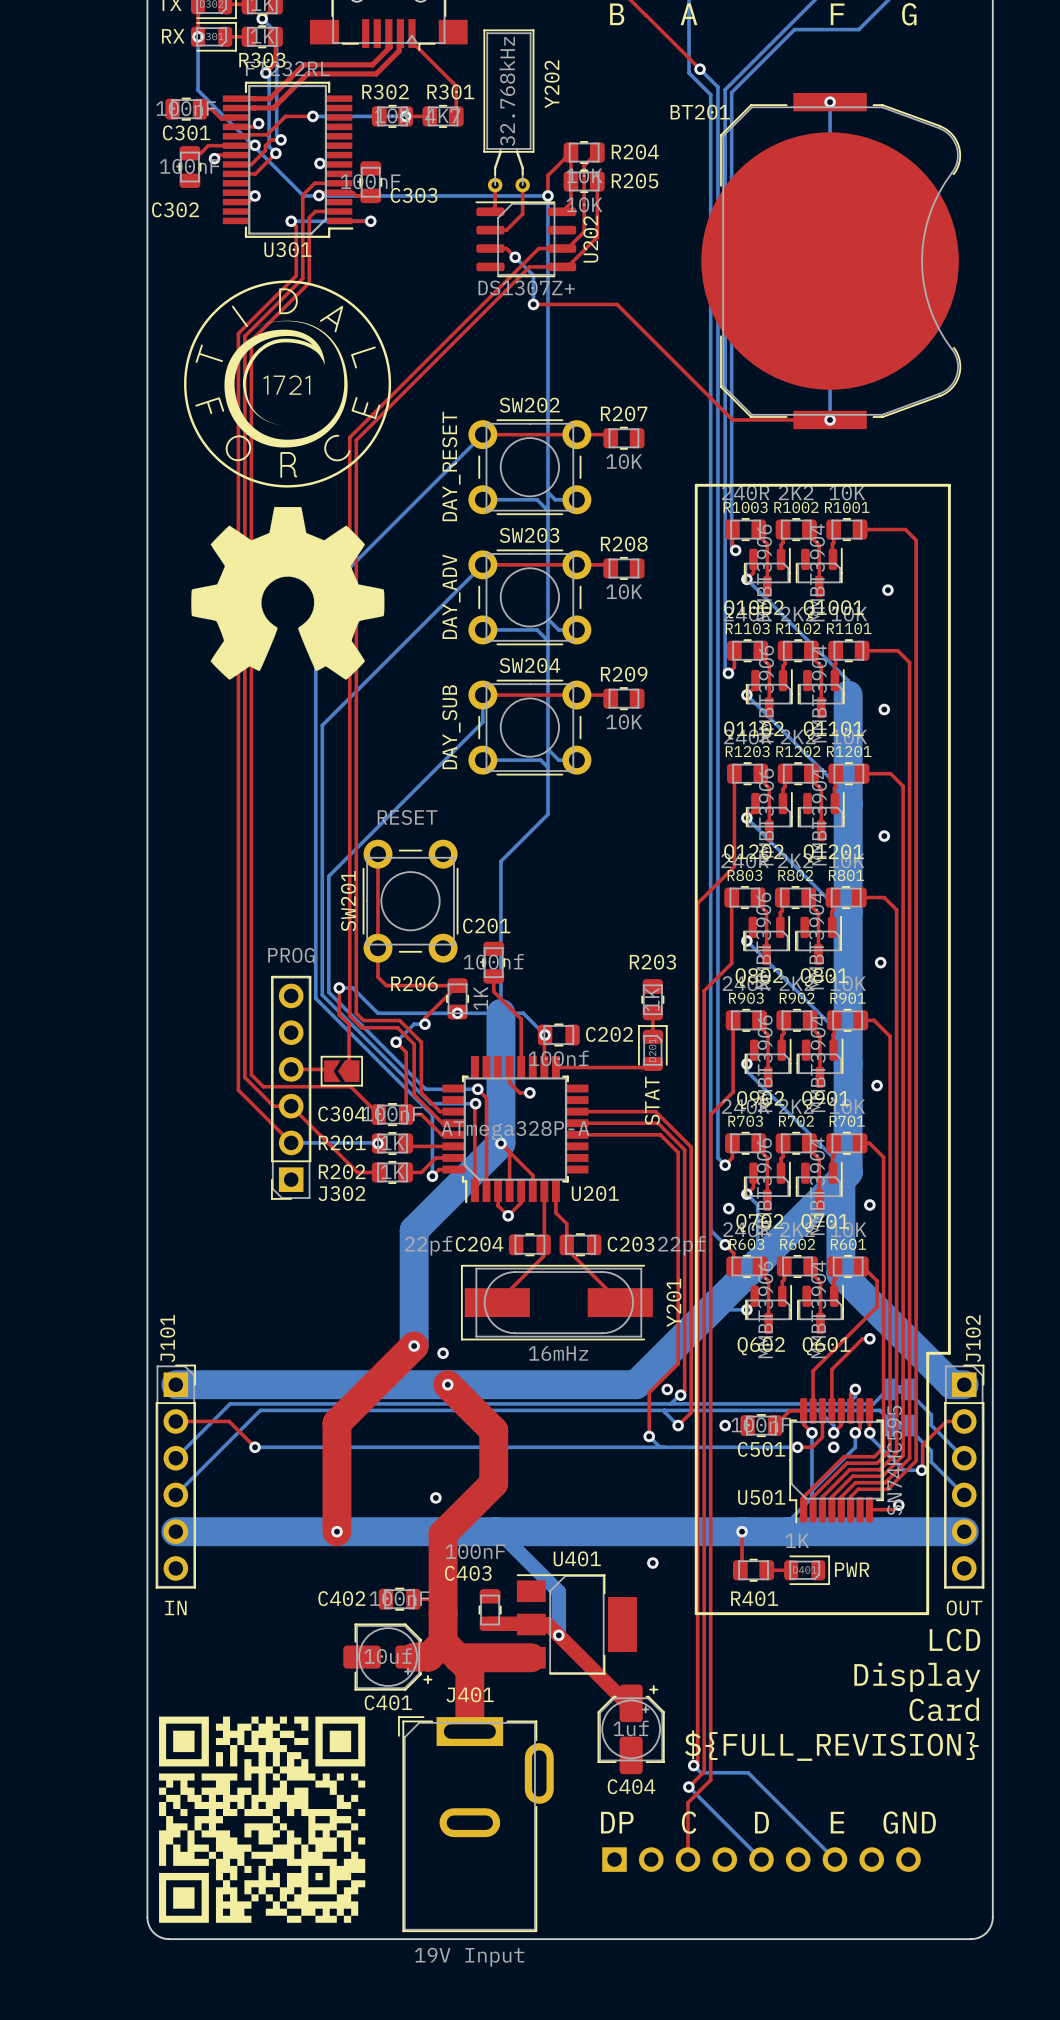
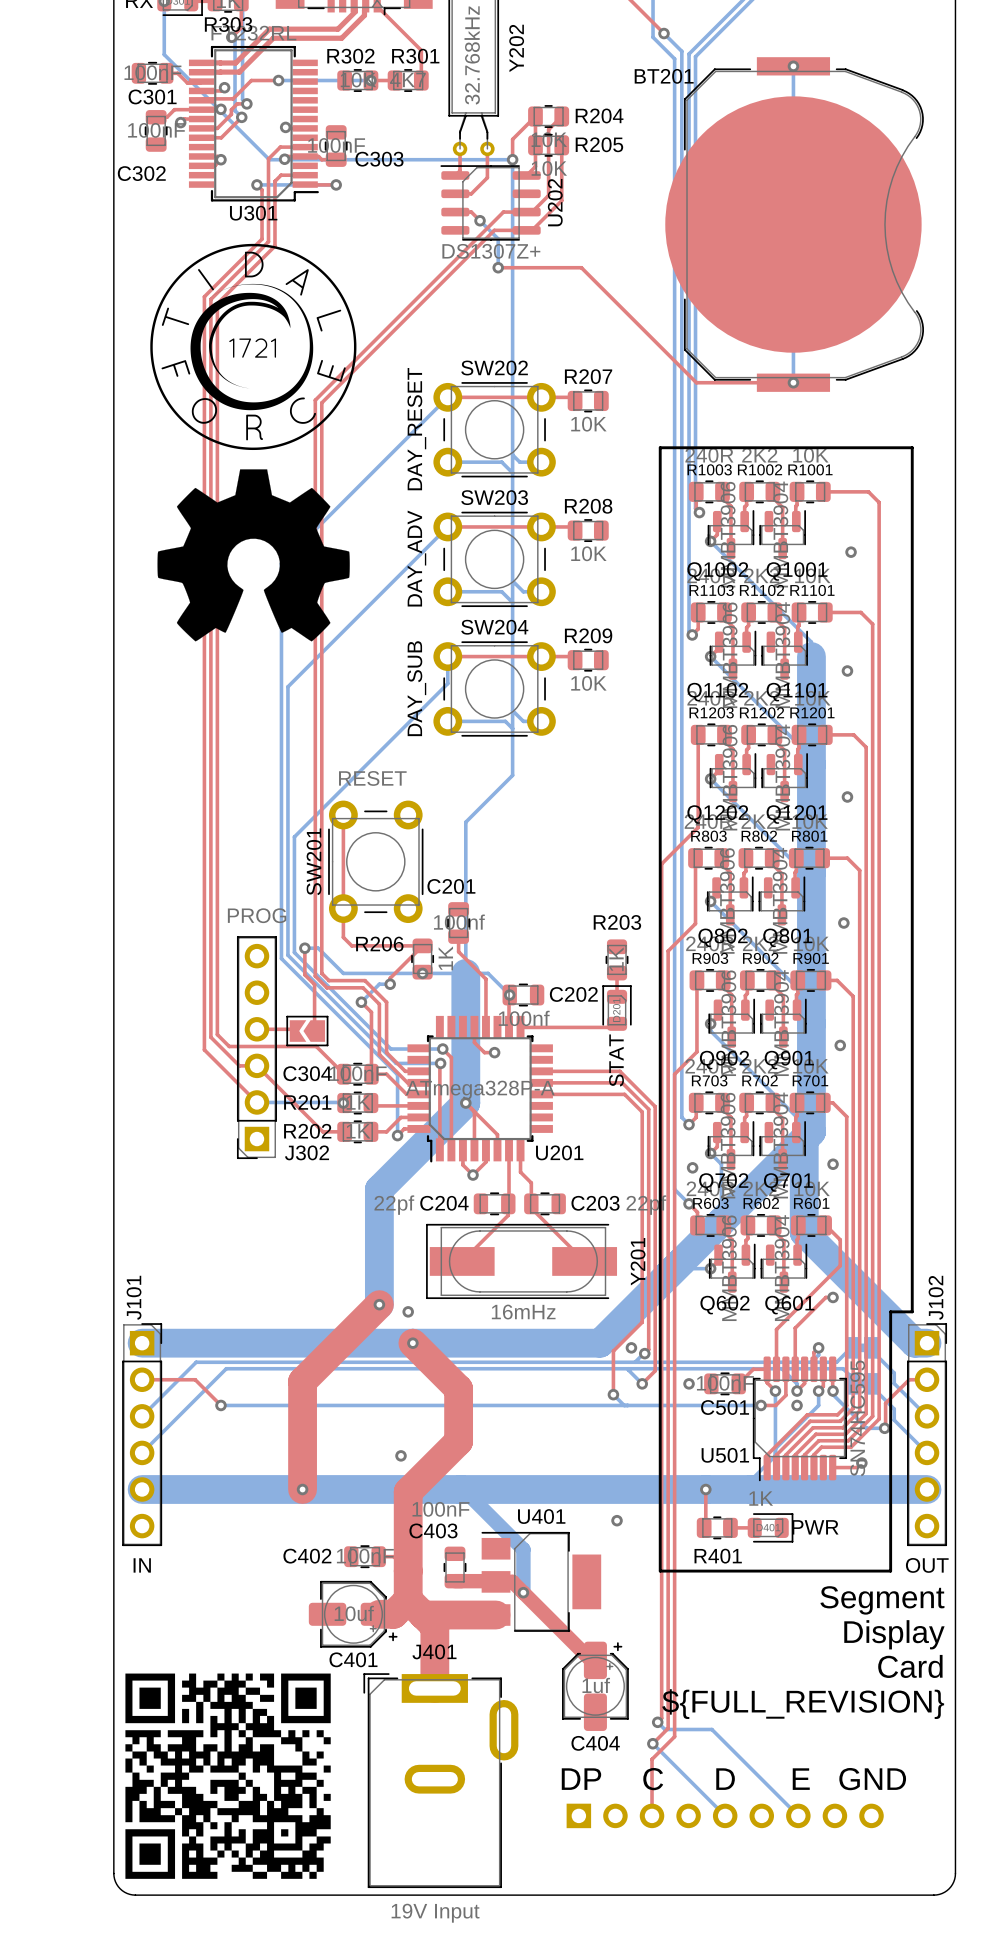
text: LCD (954, 1640) -> Segment (882, 1600)

